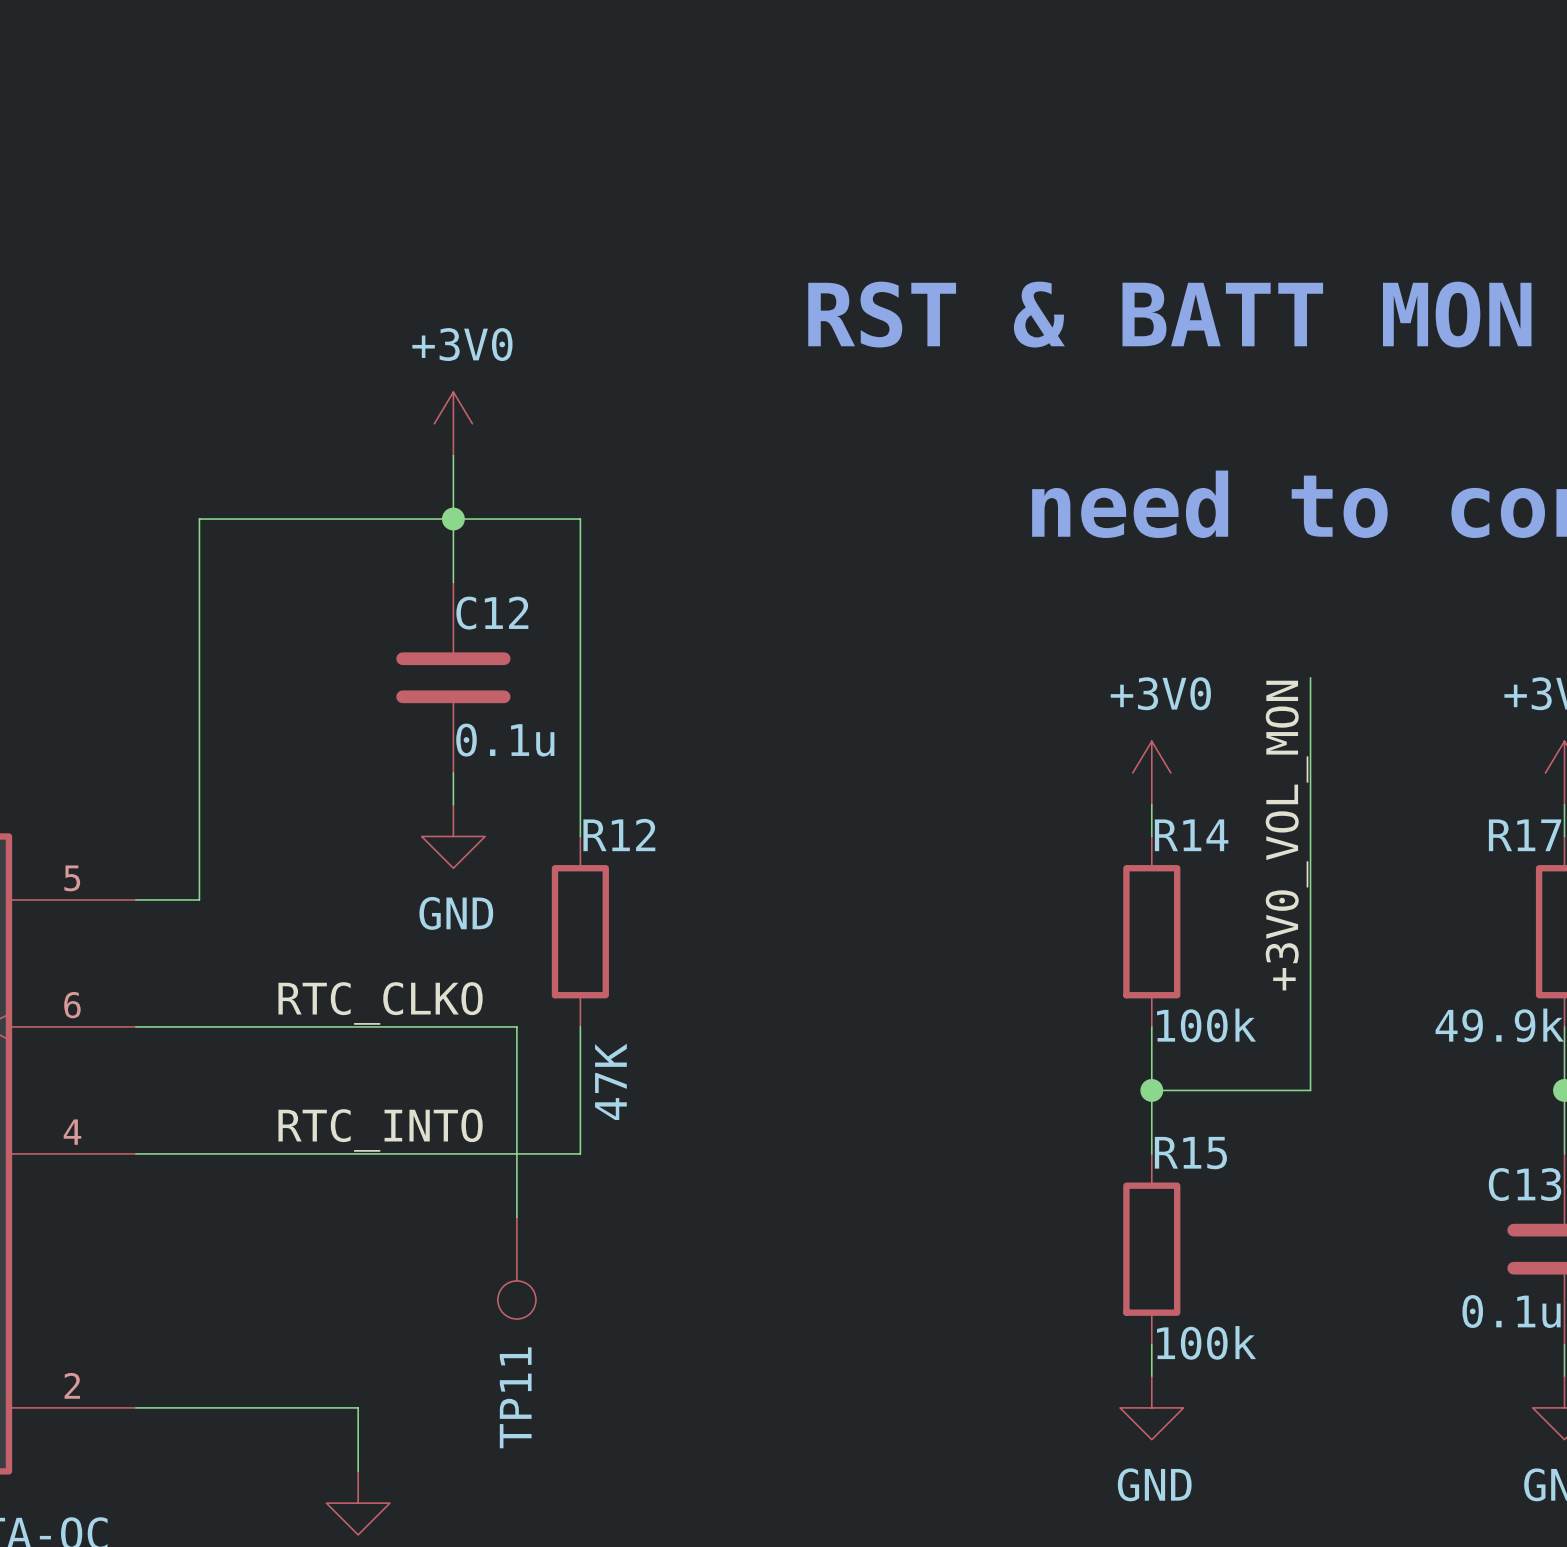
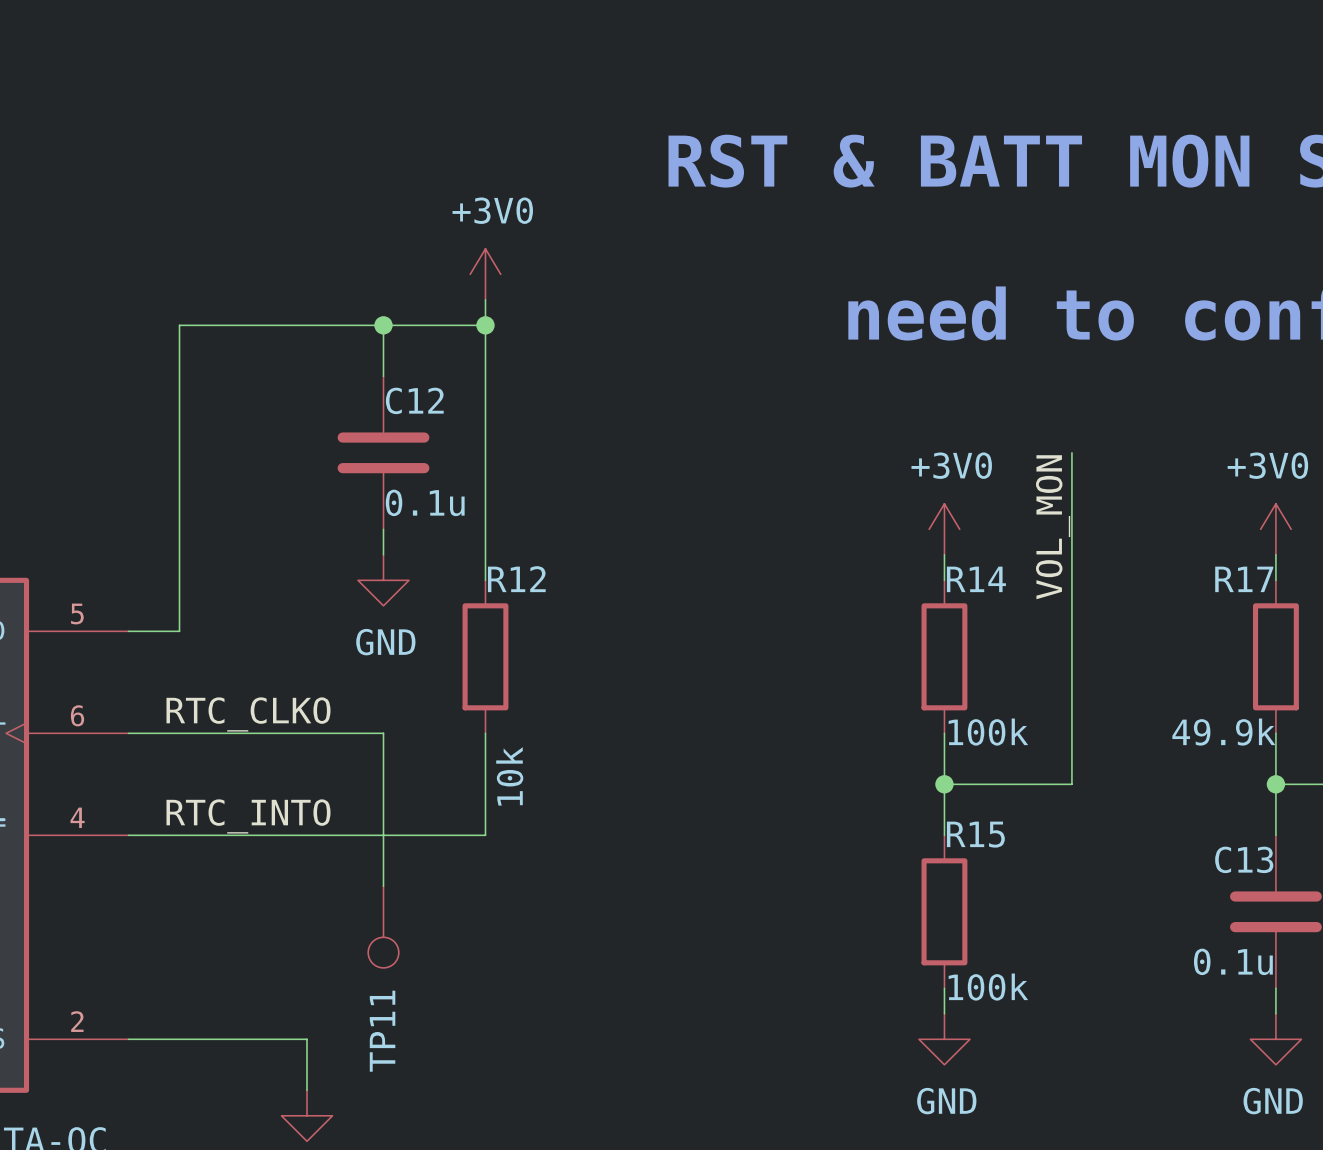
power symbol position: +3V0 (453, 423) -> +3V0 (485, 274)
wire: (453, 455) (453, 519) -> none
wire: none -> (485, 299) (485, 325)
junction: none -> (485, 325)
label: +3V0_VOL_MON (1287, 835) -> VOL_MON (1053, 527)
label position: RTC_CLKO (380, 1003) -> RTC_CLKO (248, 714)
wire: (453, 1026) (516, 1026) (516, 1217) -> (383, 733) (383, 886)
R12 value: 47K (610, 1081) -> 10k (509, 776)
label position: RTC_INTO (380, 1130) -> RTC_INTO (248, 816)
TP11 position: (516, 1268) -> (383, 927)

